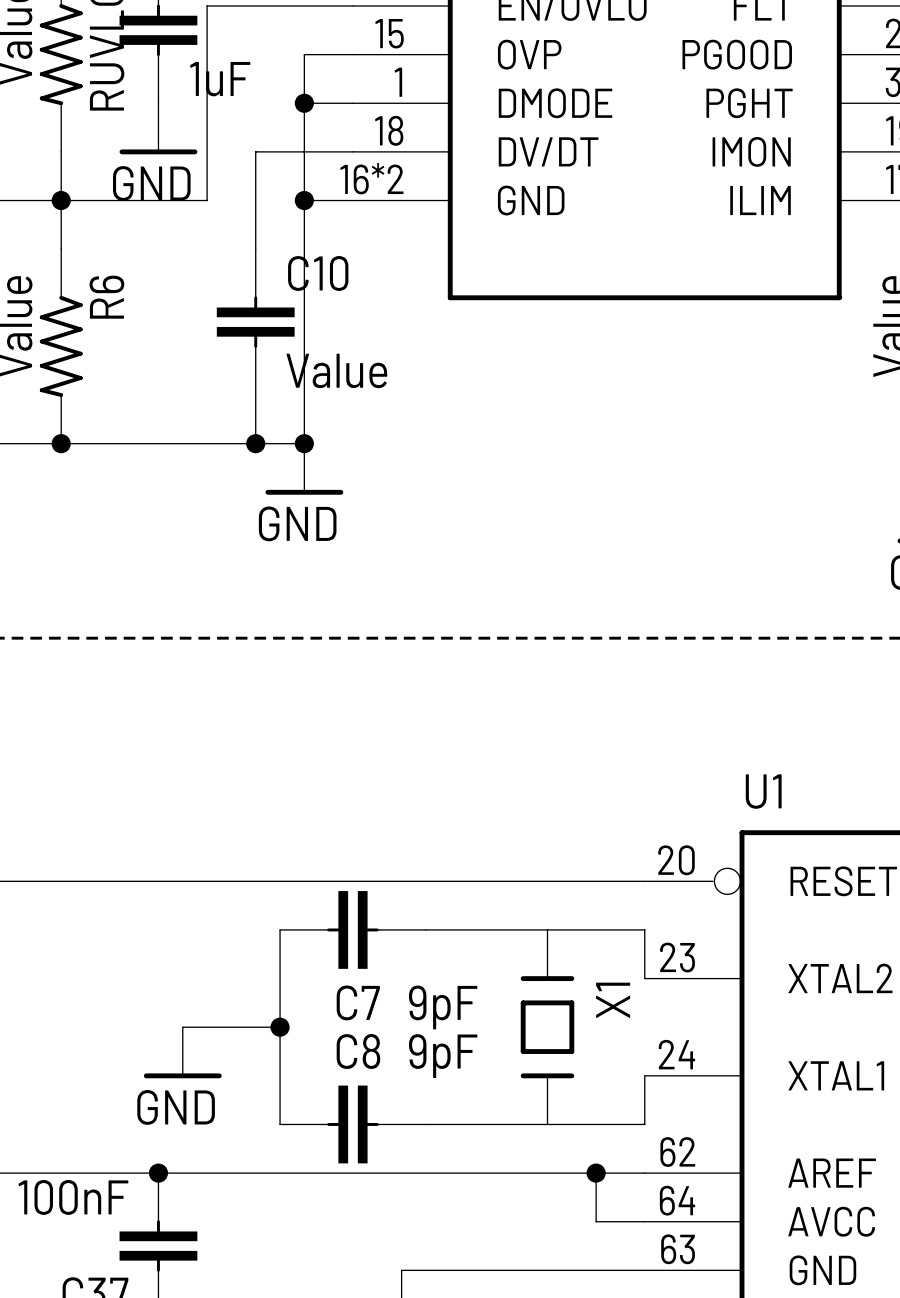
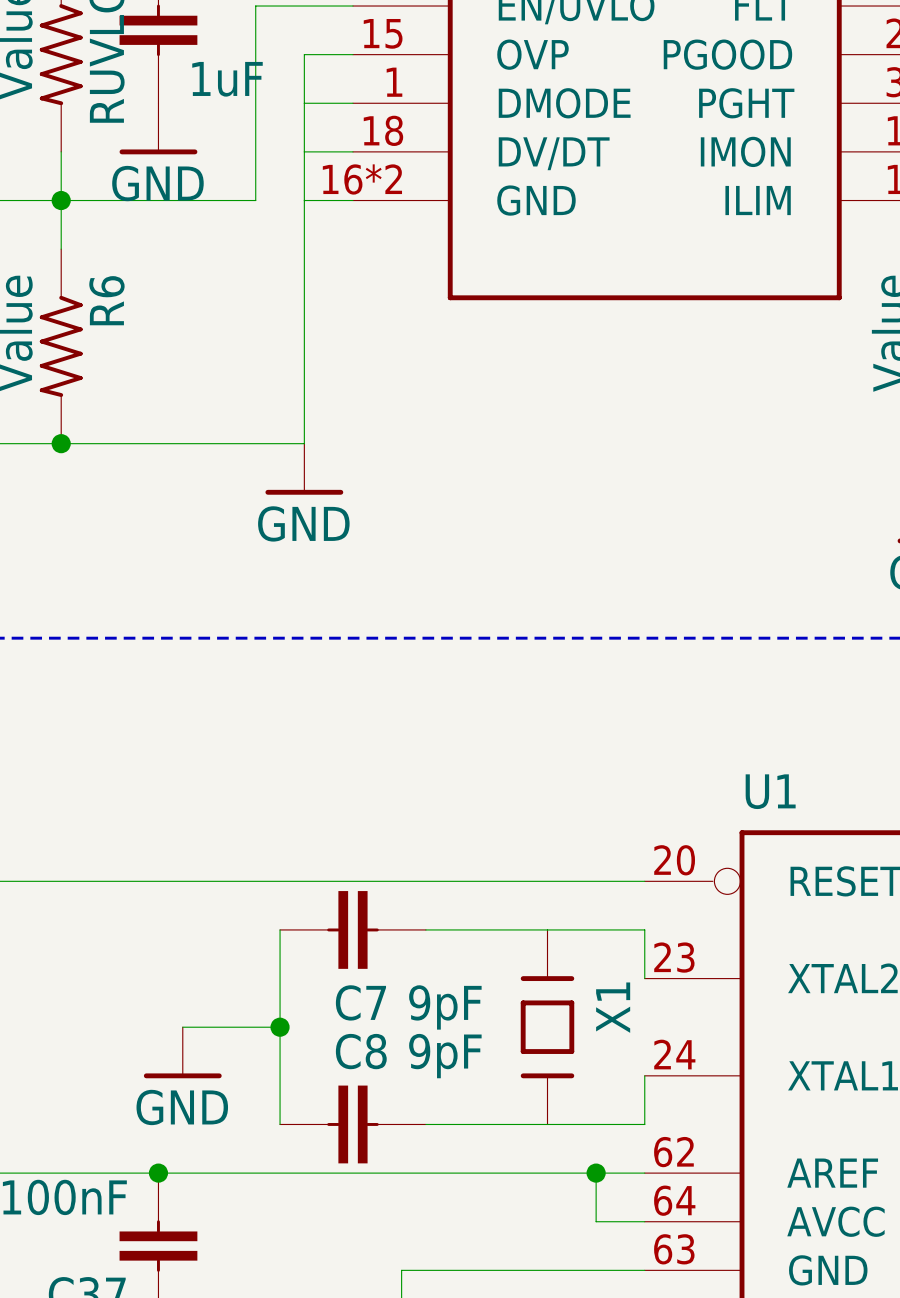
wire: (255, 6) (207, 6) (207, 200) -> (255, 6) (255, 151)
junction: (304, 103) -> none
wire: (255, 151) (304, 151) -> none
wire: (255, 200) (255, 249) -> (255, 200) (207, 200)
junction: (304, 200) -> none
C10: Value (255, 322) -> none
wire: (255, 395) (255, 443) -> none
junction: (255, 443) -> none
junction: (304, 443) -> none

